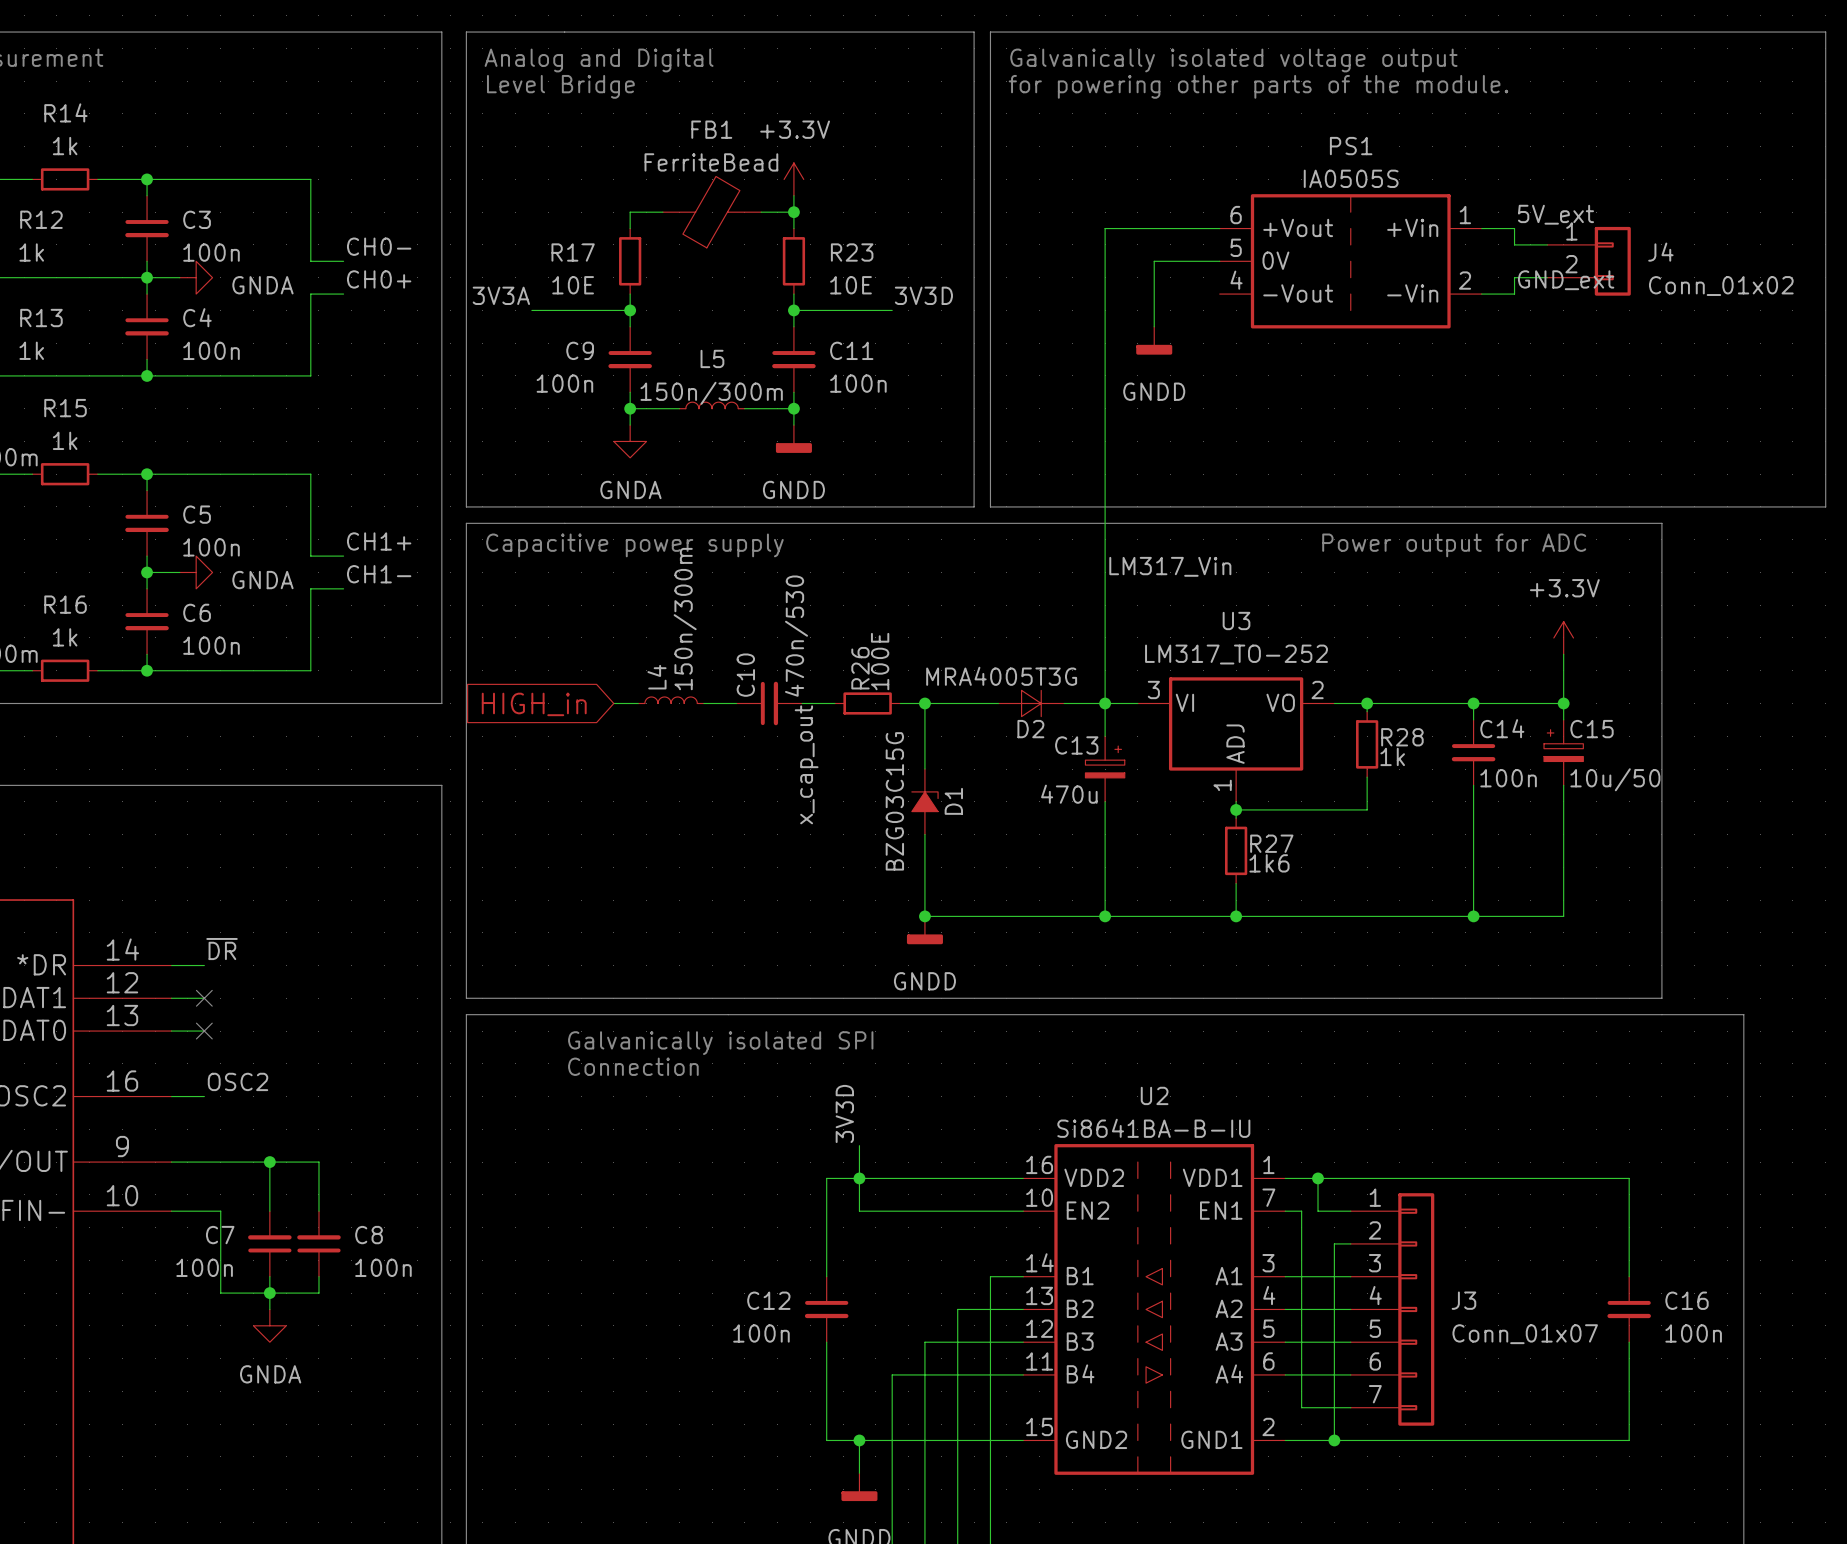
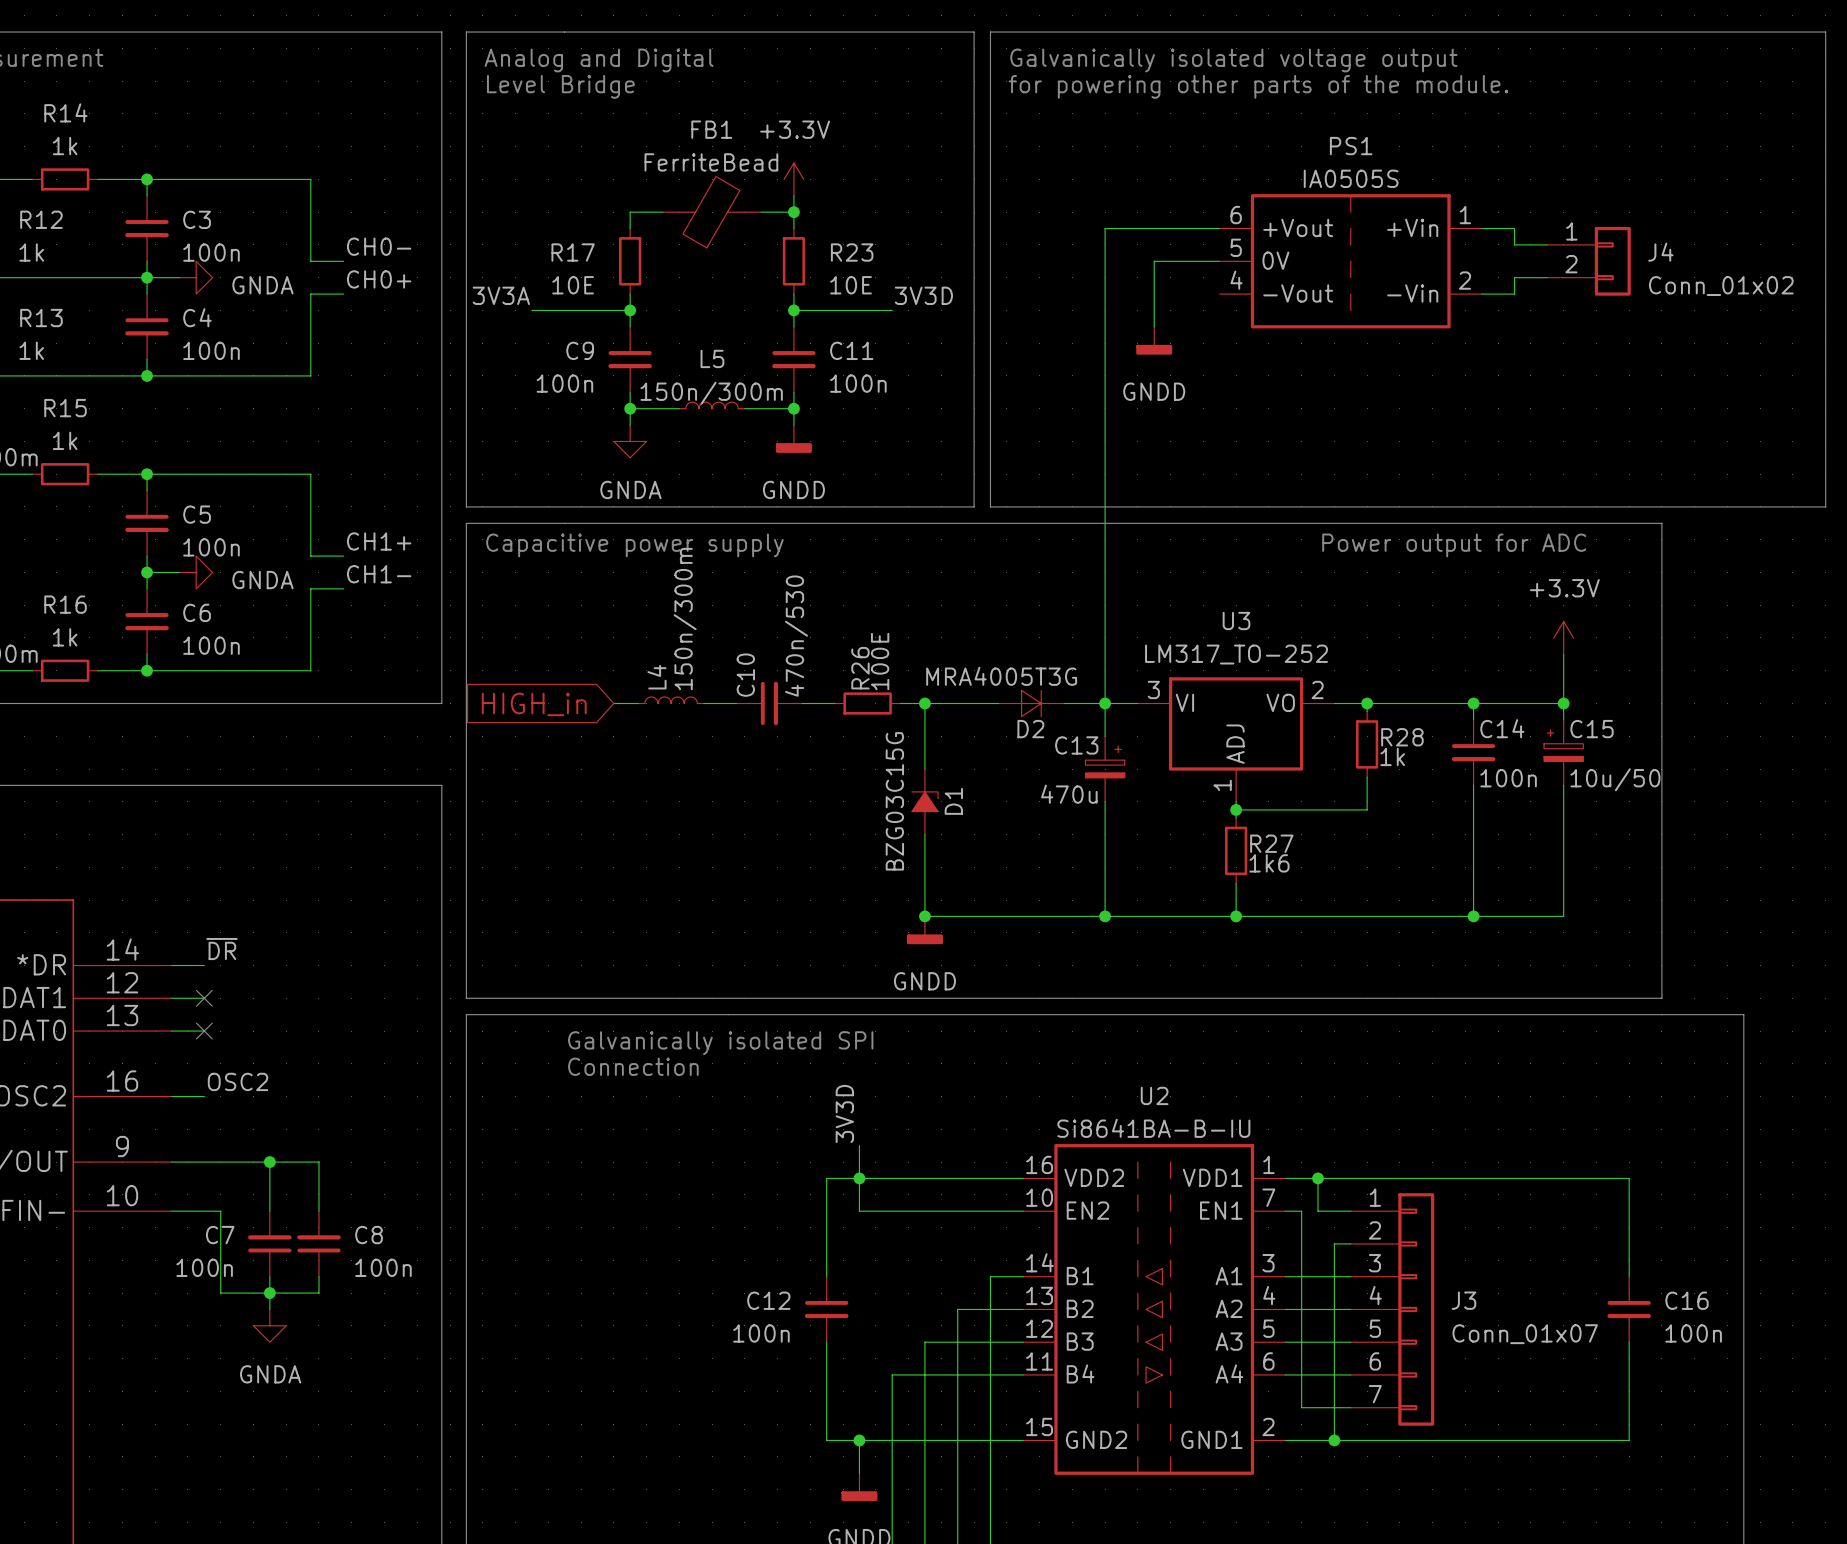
label: 5V_ext (1555, 214) -> none
label: GND_ext (1566, 280) -> none
label: LM317_Vin (1170, 566) -> none
label: x_cap_out (806, 764) -> none

